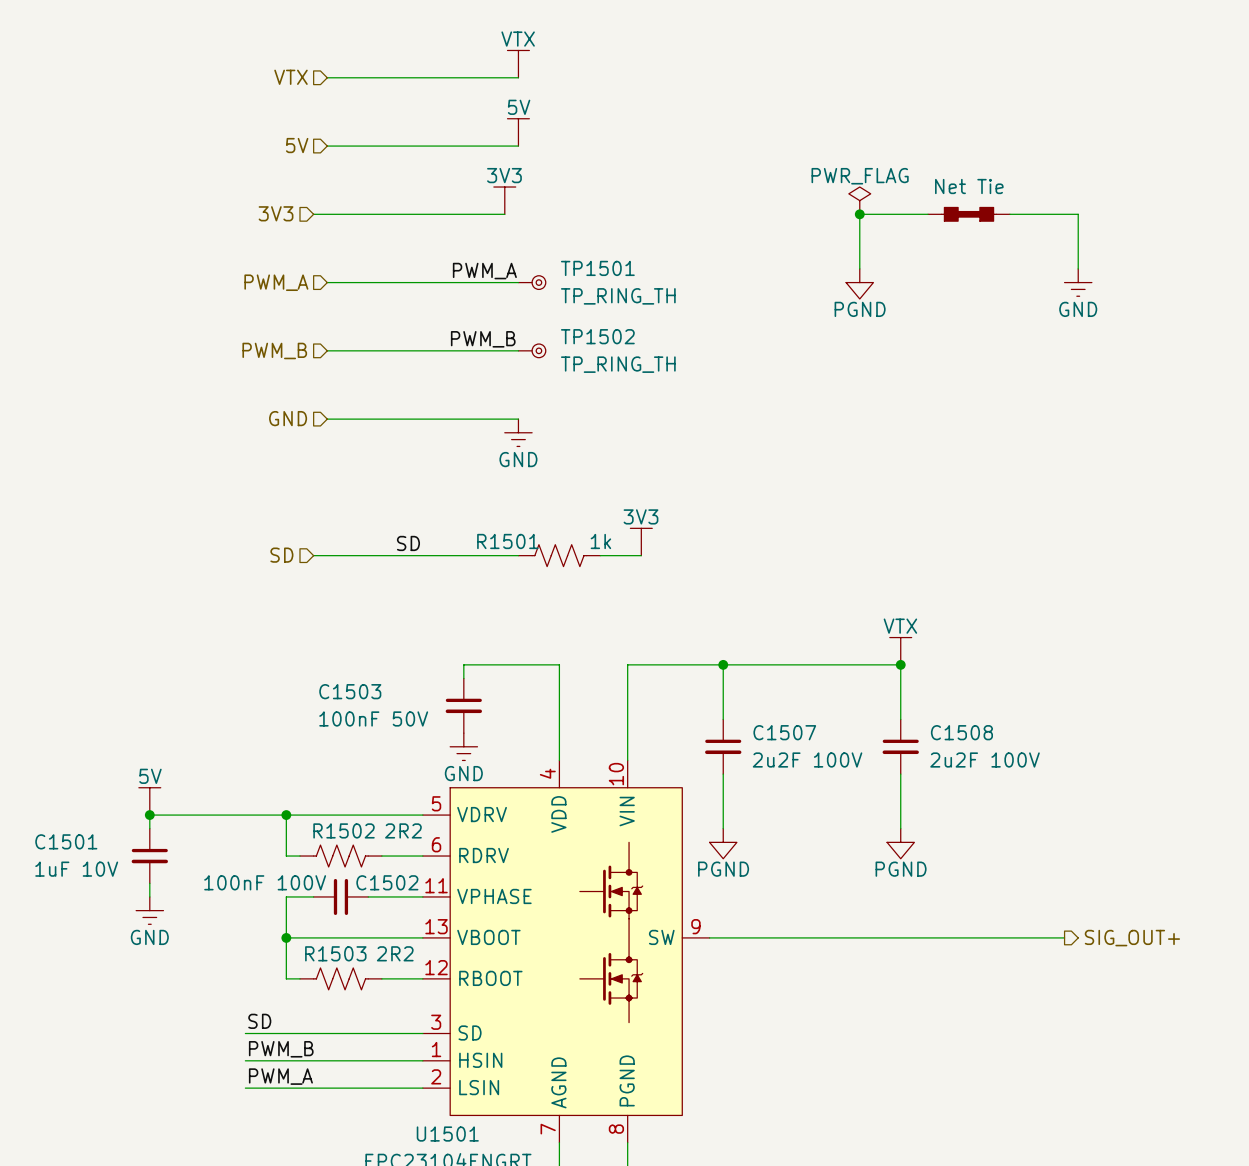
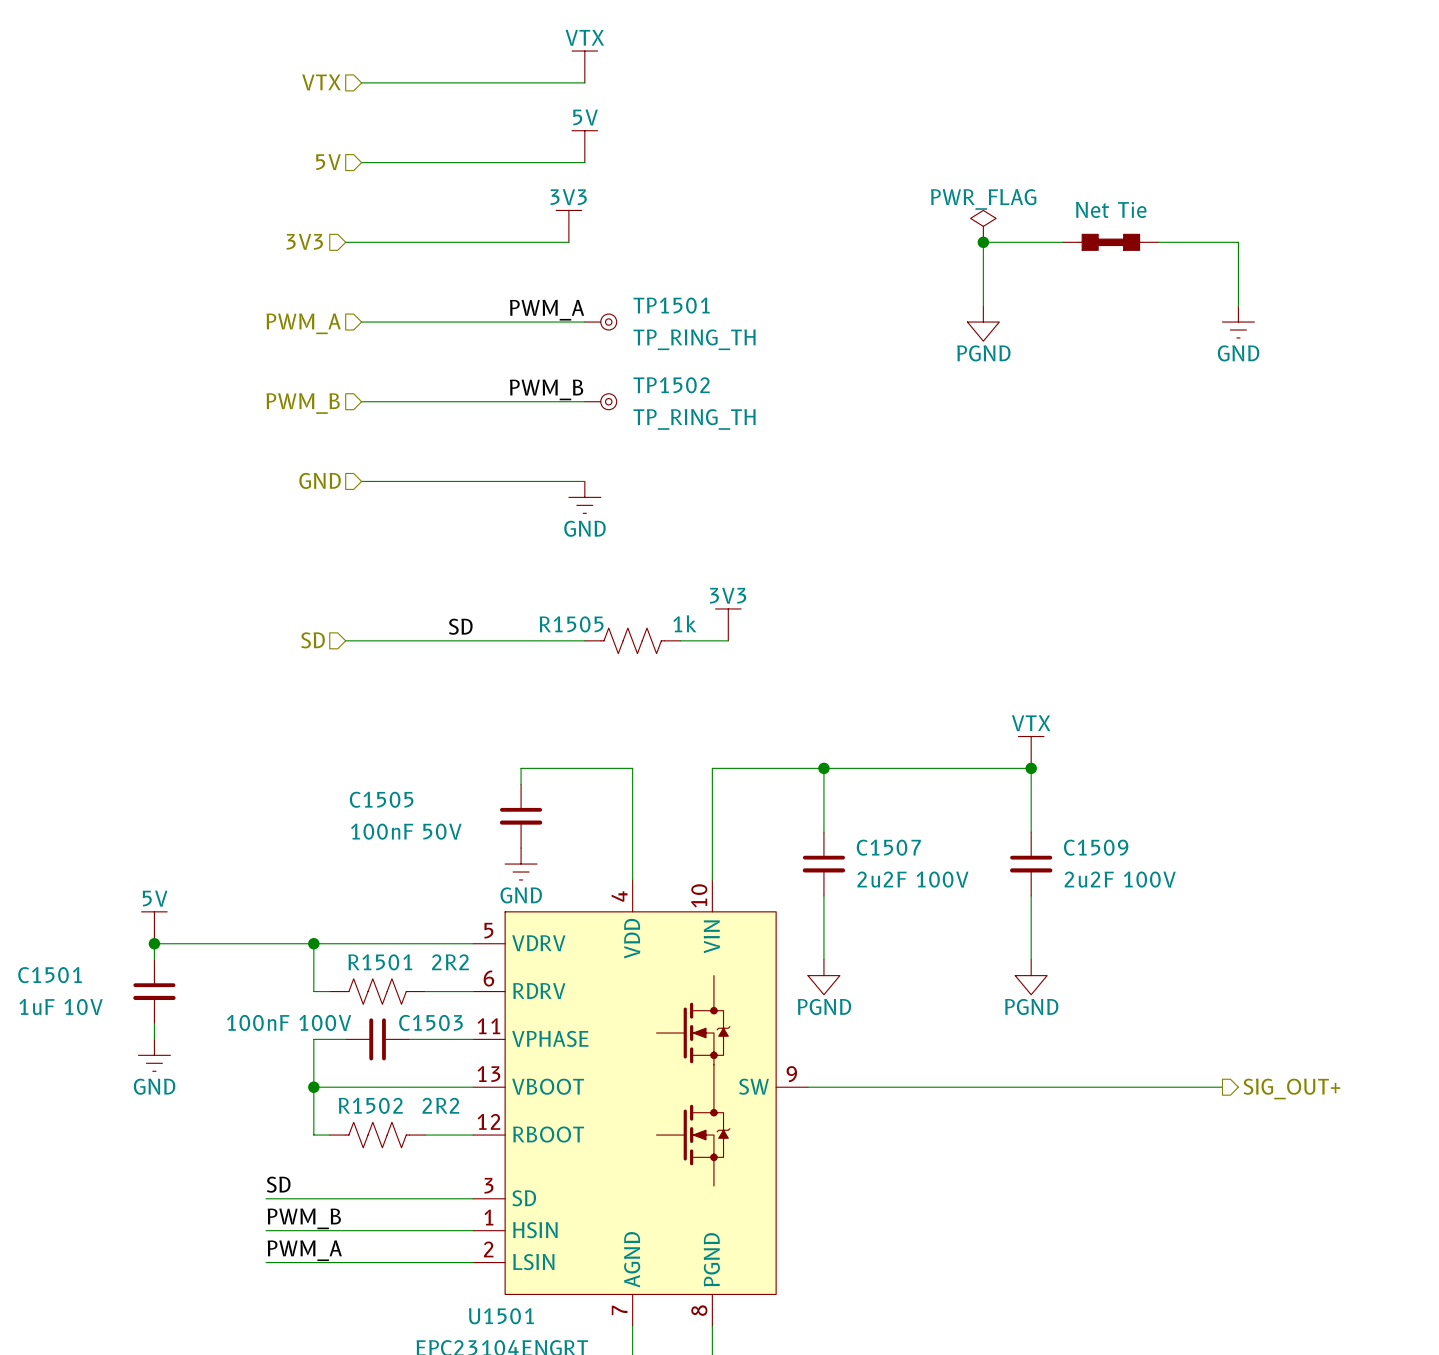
R1501 name: R1501 (507, 541) -> R1505 (571, 624)
C1503 name: C1503 (350, 691) -> C1505 (381, 799)
C1508 name: C1508 (961, 732) -> C1509 (1096, 847)
R1502 name: R1502 (344, 830) -> R1501 (380, 962)
C1502 name: C1502 (387, 882) -> C1503 (430, 1022)
R1503 name: R1503 (335, 953) -> R1502 (370, 1105)

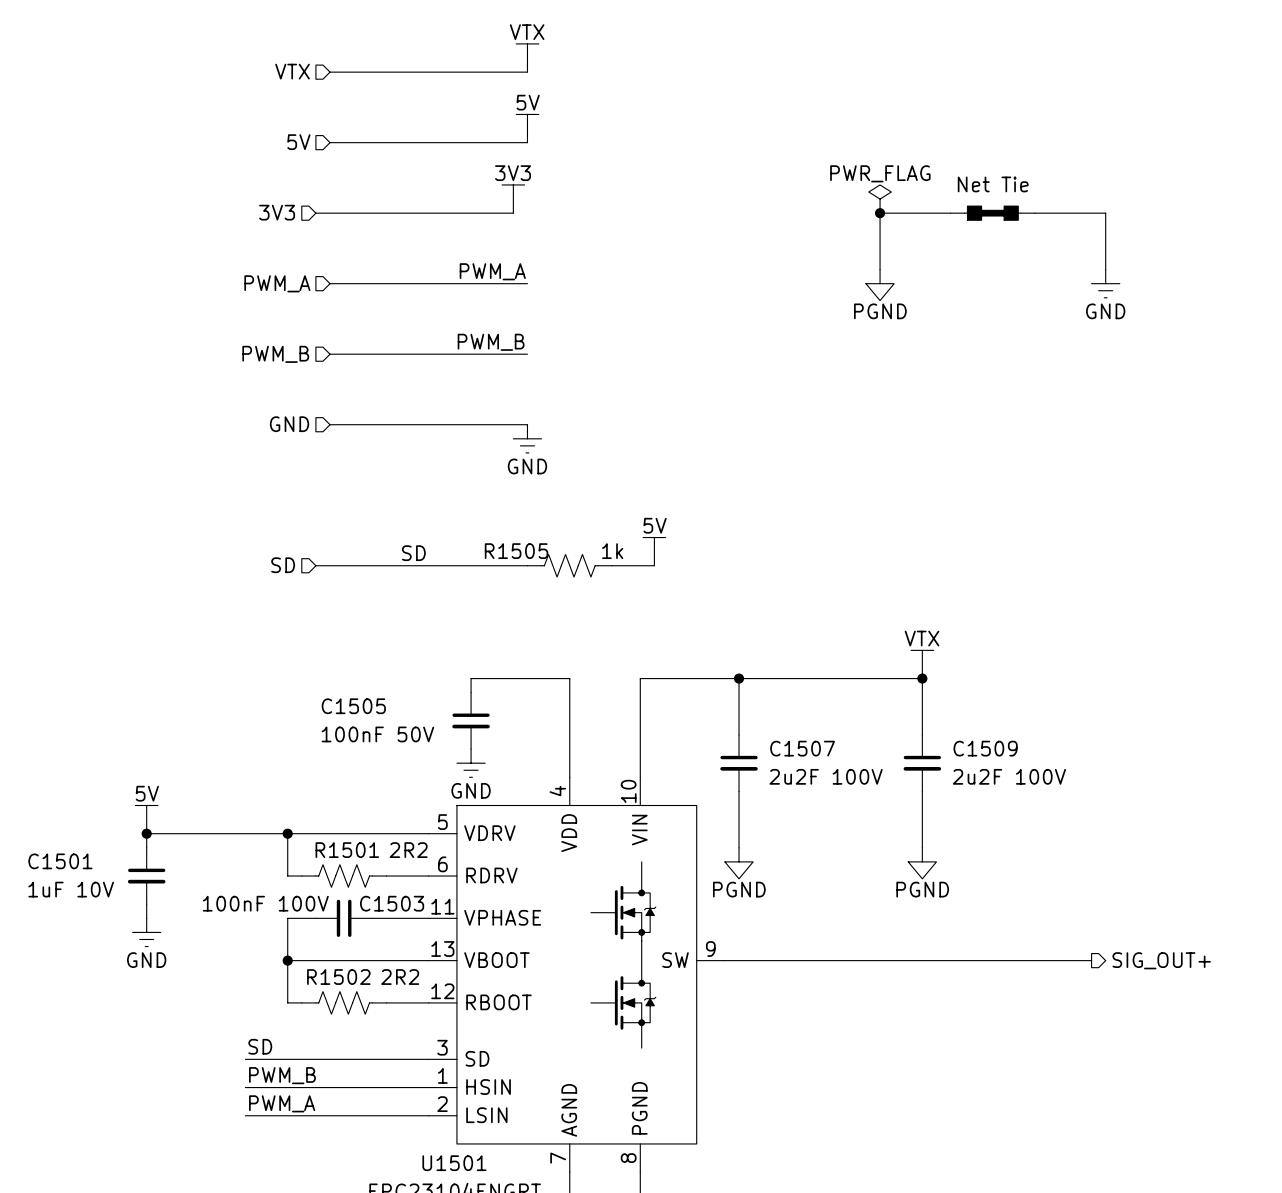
TP1501: TP_RING_TH (600, 322) -> none
TP1502: TP_RING_TH (600, 401) -> none
power symbol: 3V3 (728, 624) -> 5V (654, 551)

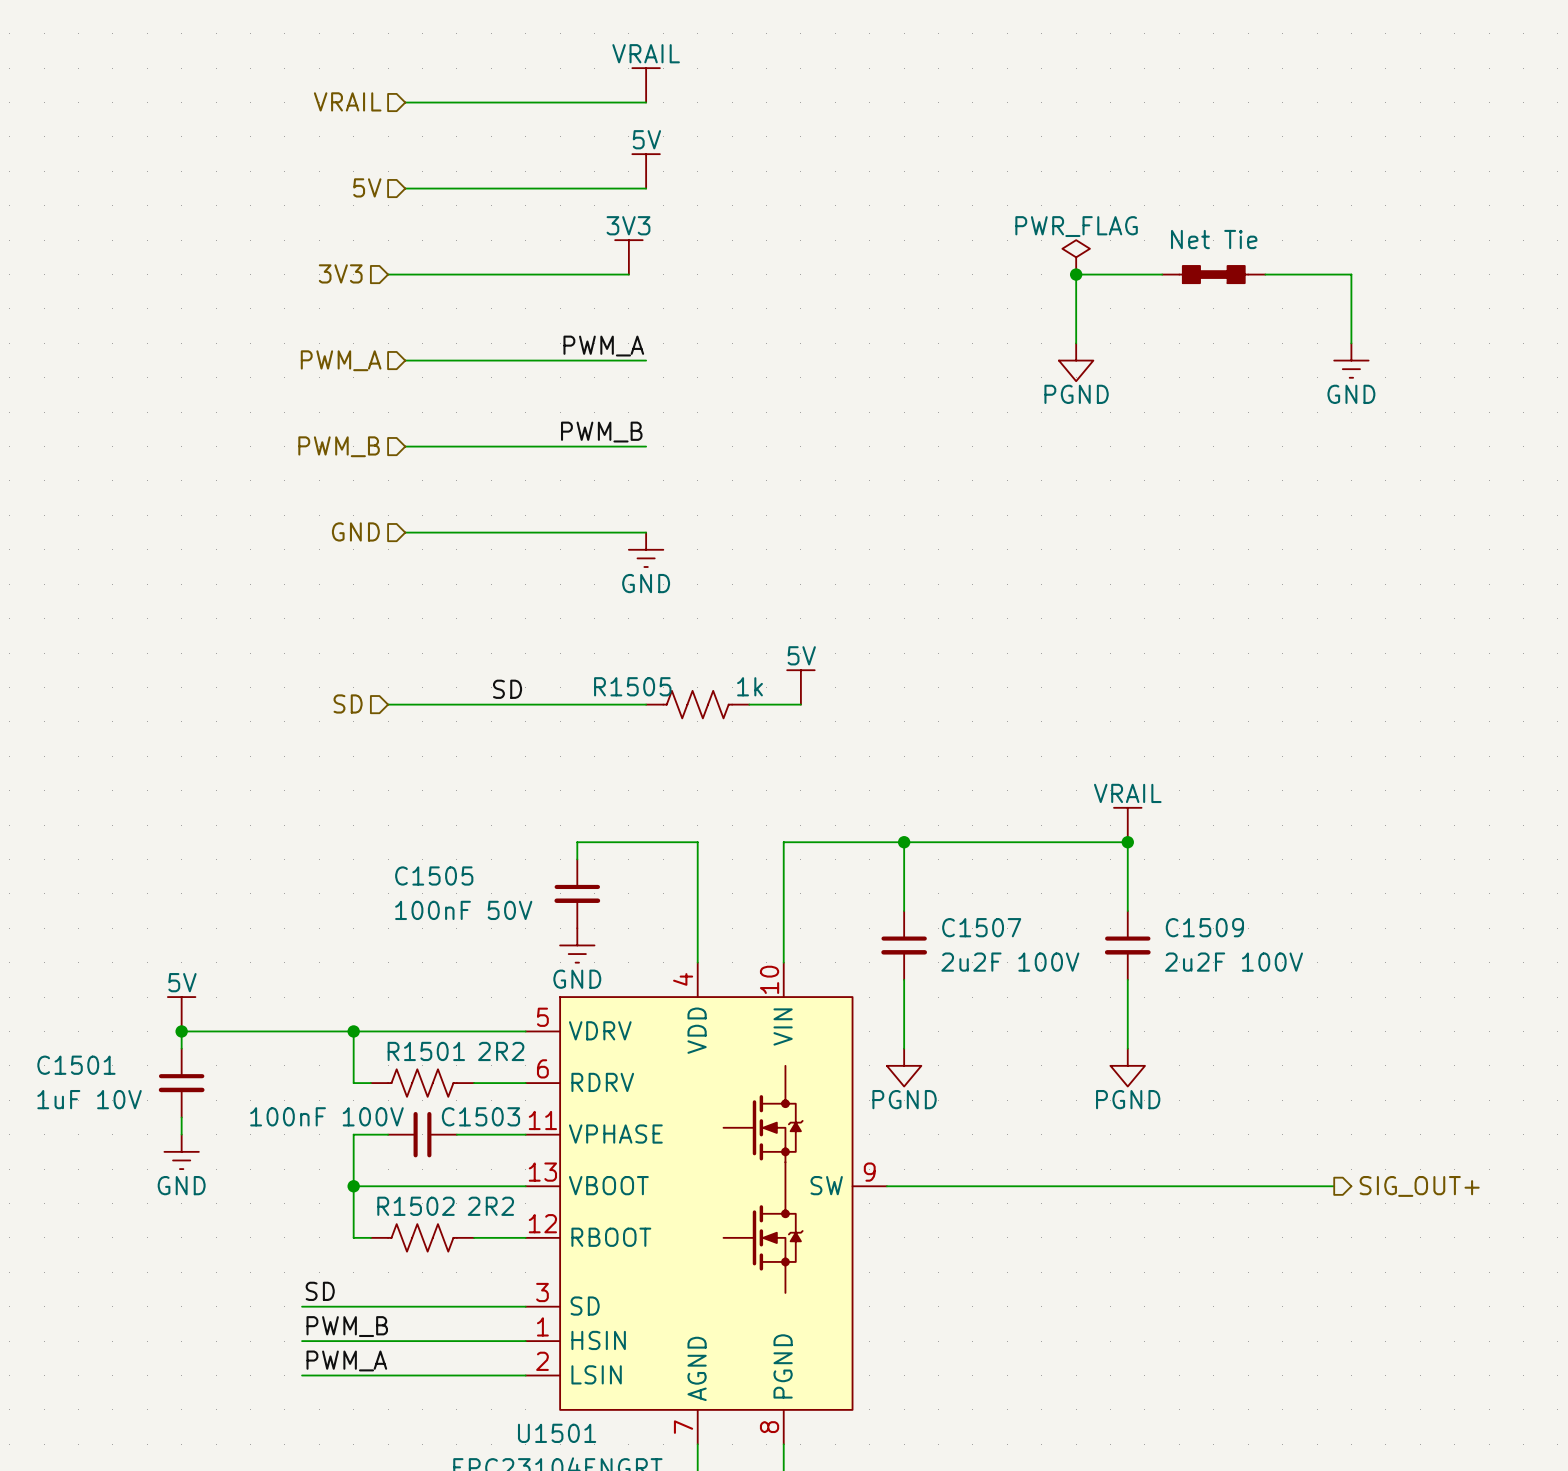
power symbol: VTX (527, 58) -> VRAIL (646, 85)
hierarchical label: VTX (292, 71) -> VRAIL (347, 101)
power symbol: VTX (922, 664) -> VRAIL (1127, 825)

